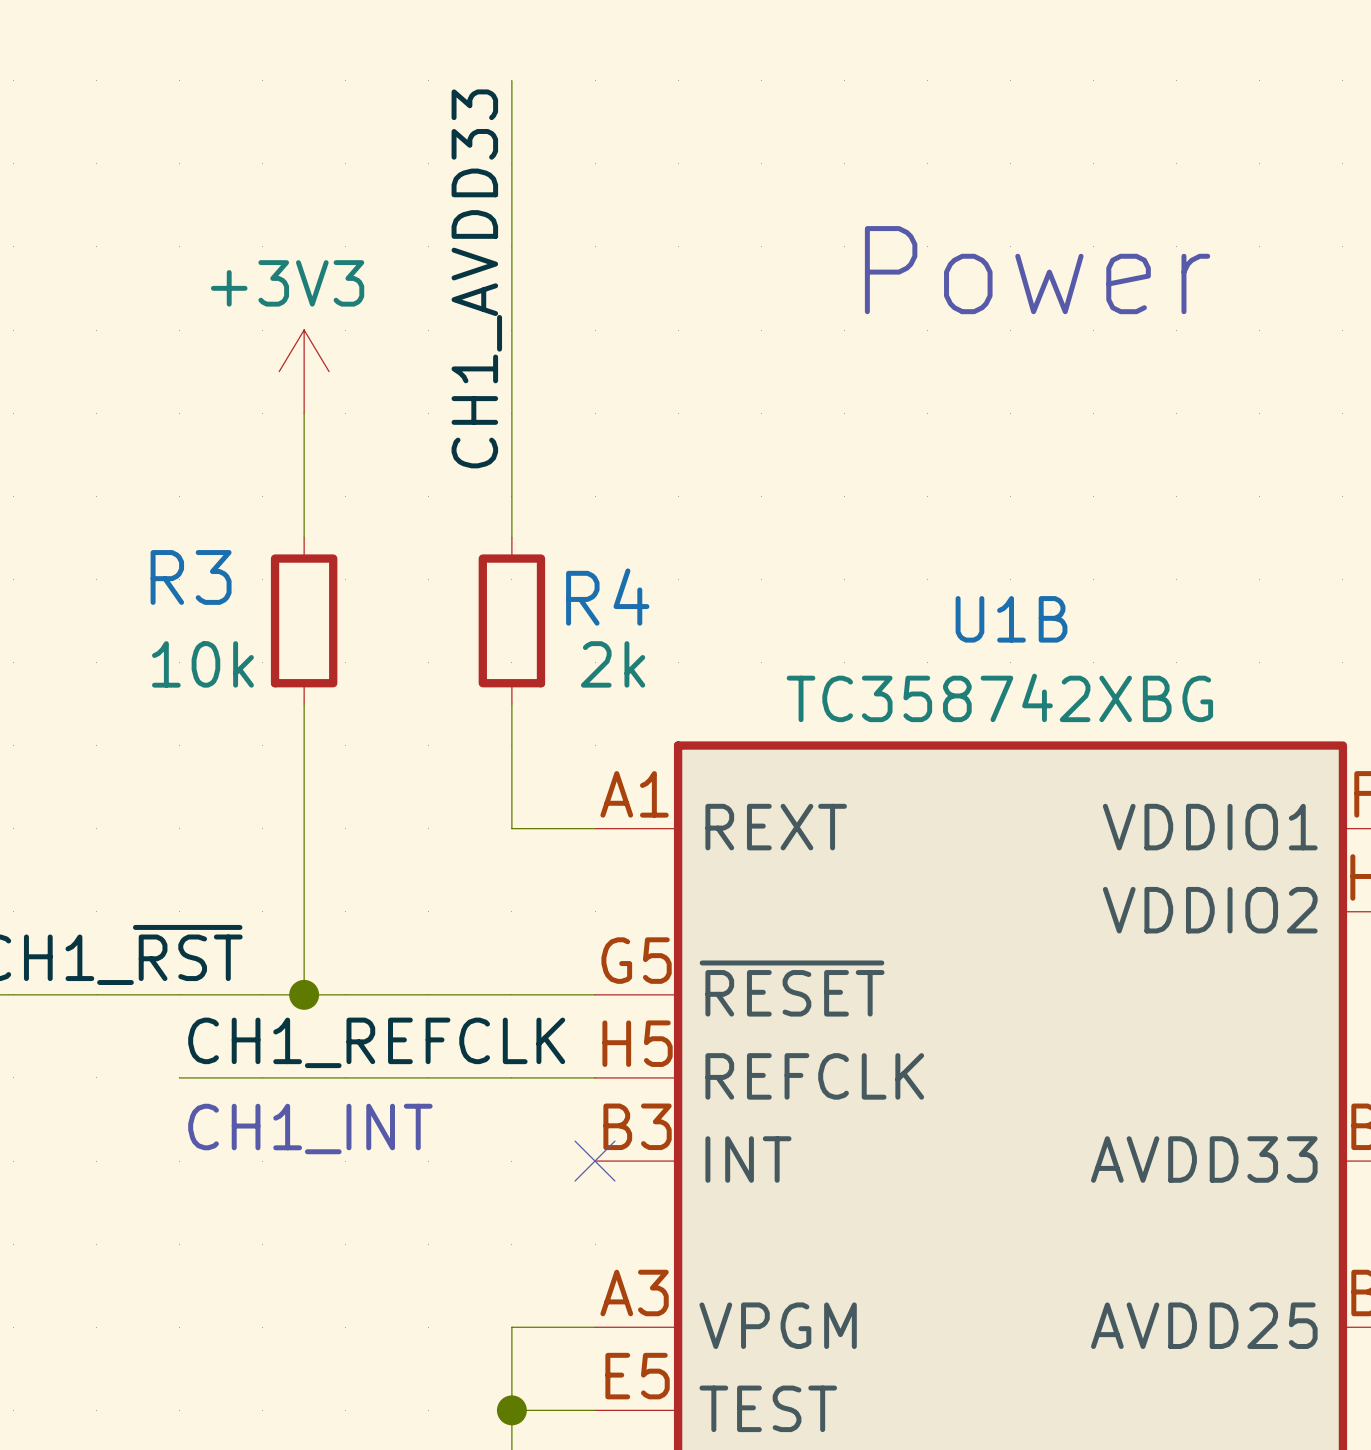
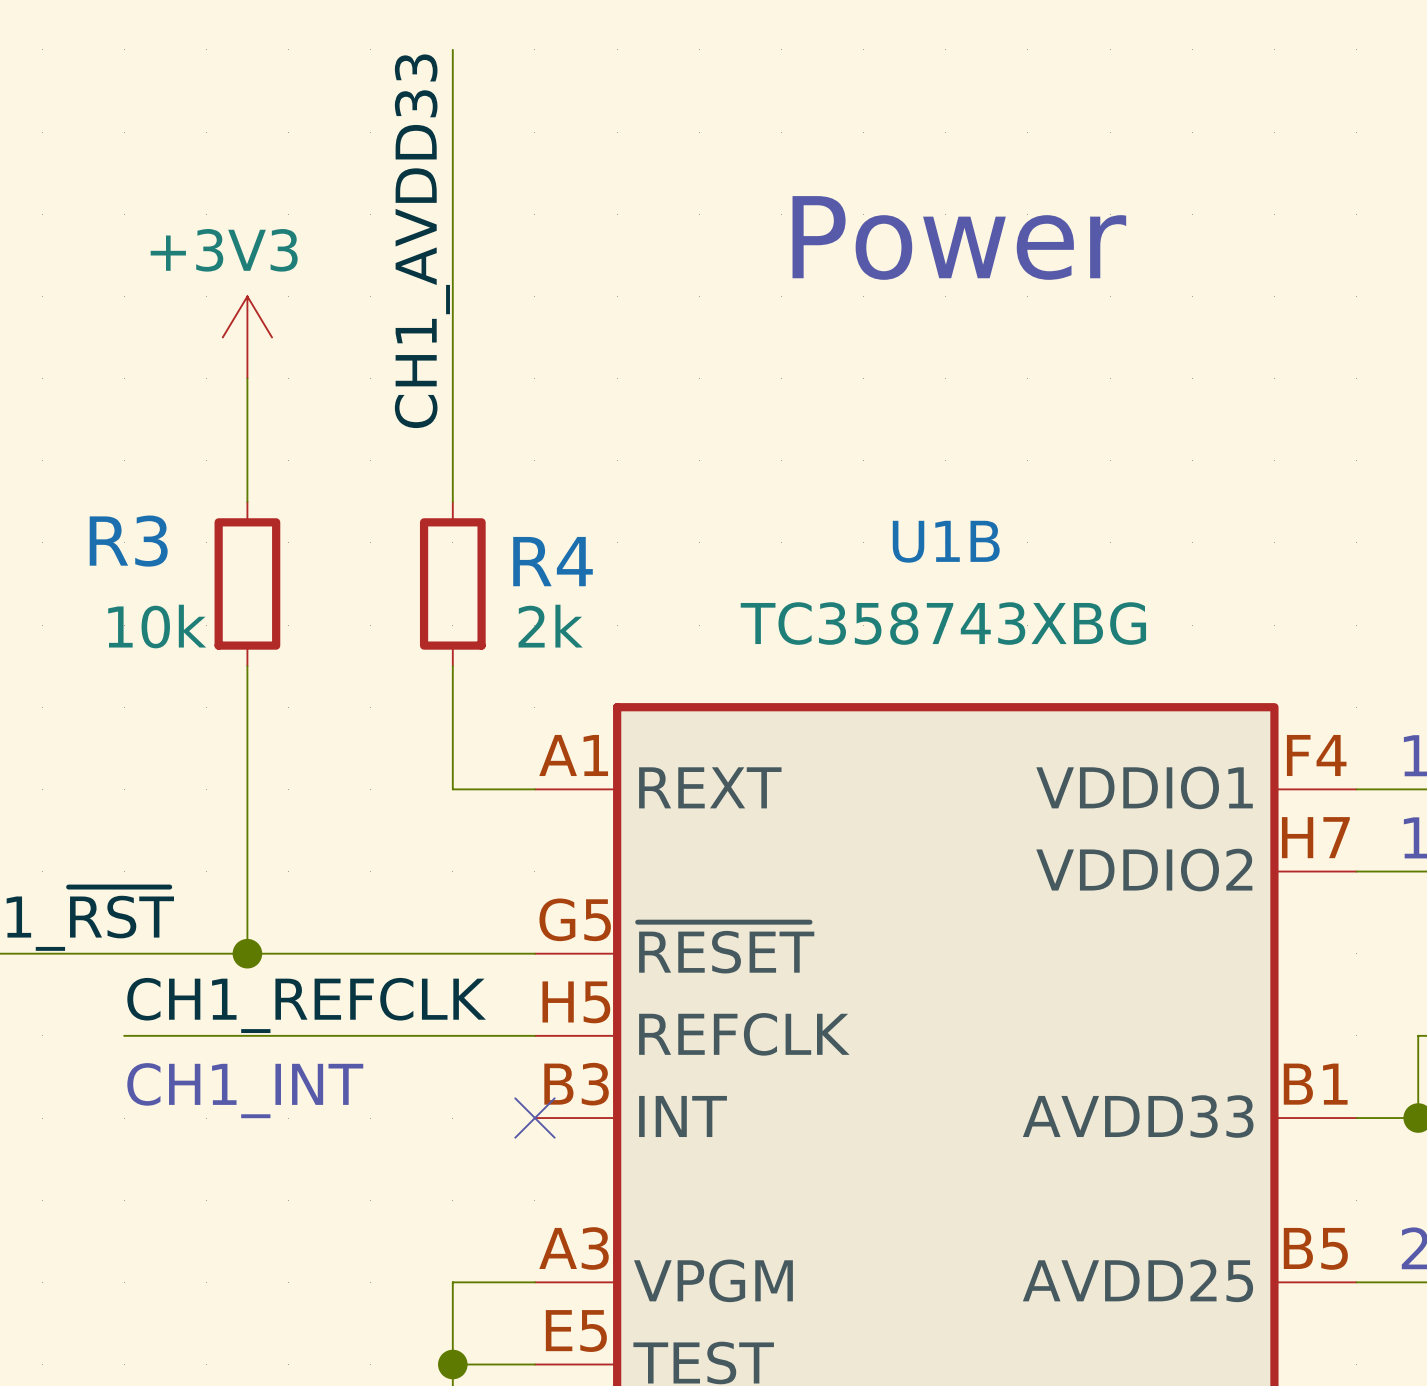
U1B name position: U1B (1011, 619) -> U1B (946, 541)
U1B text: TC358742XBG (999, 697) -> TC358743XBG (943, 623)

